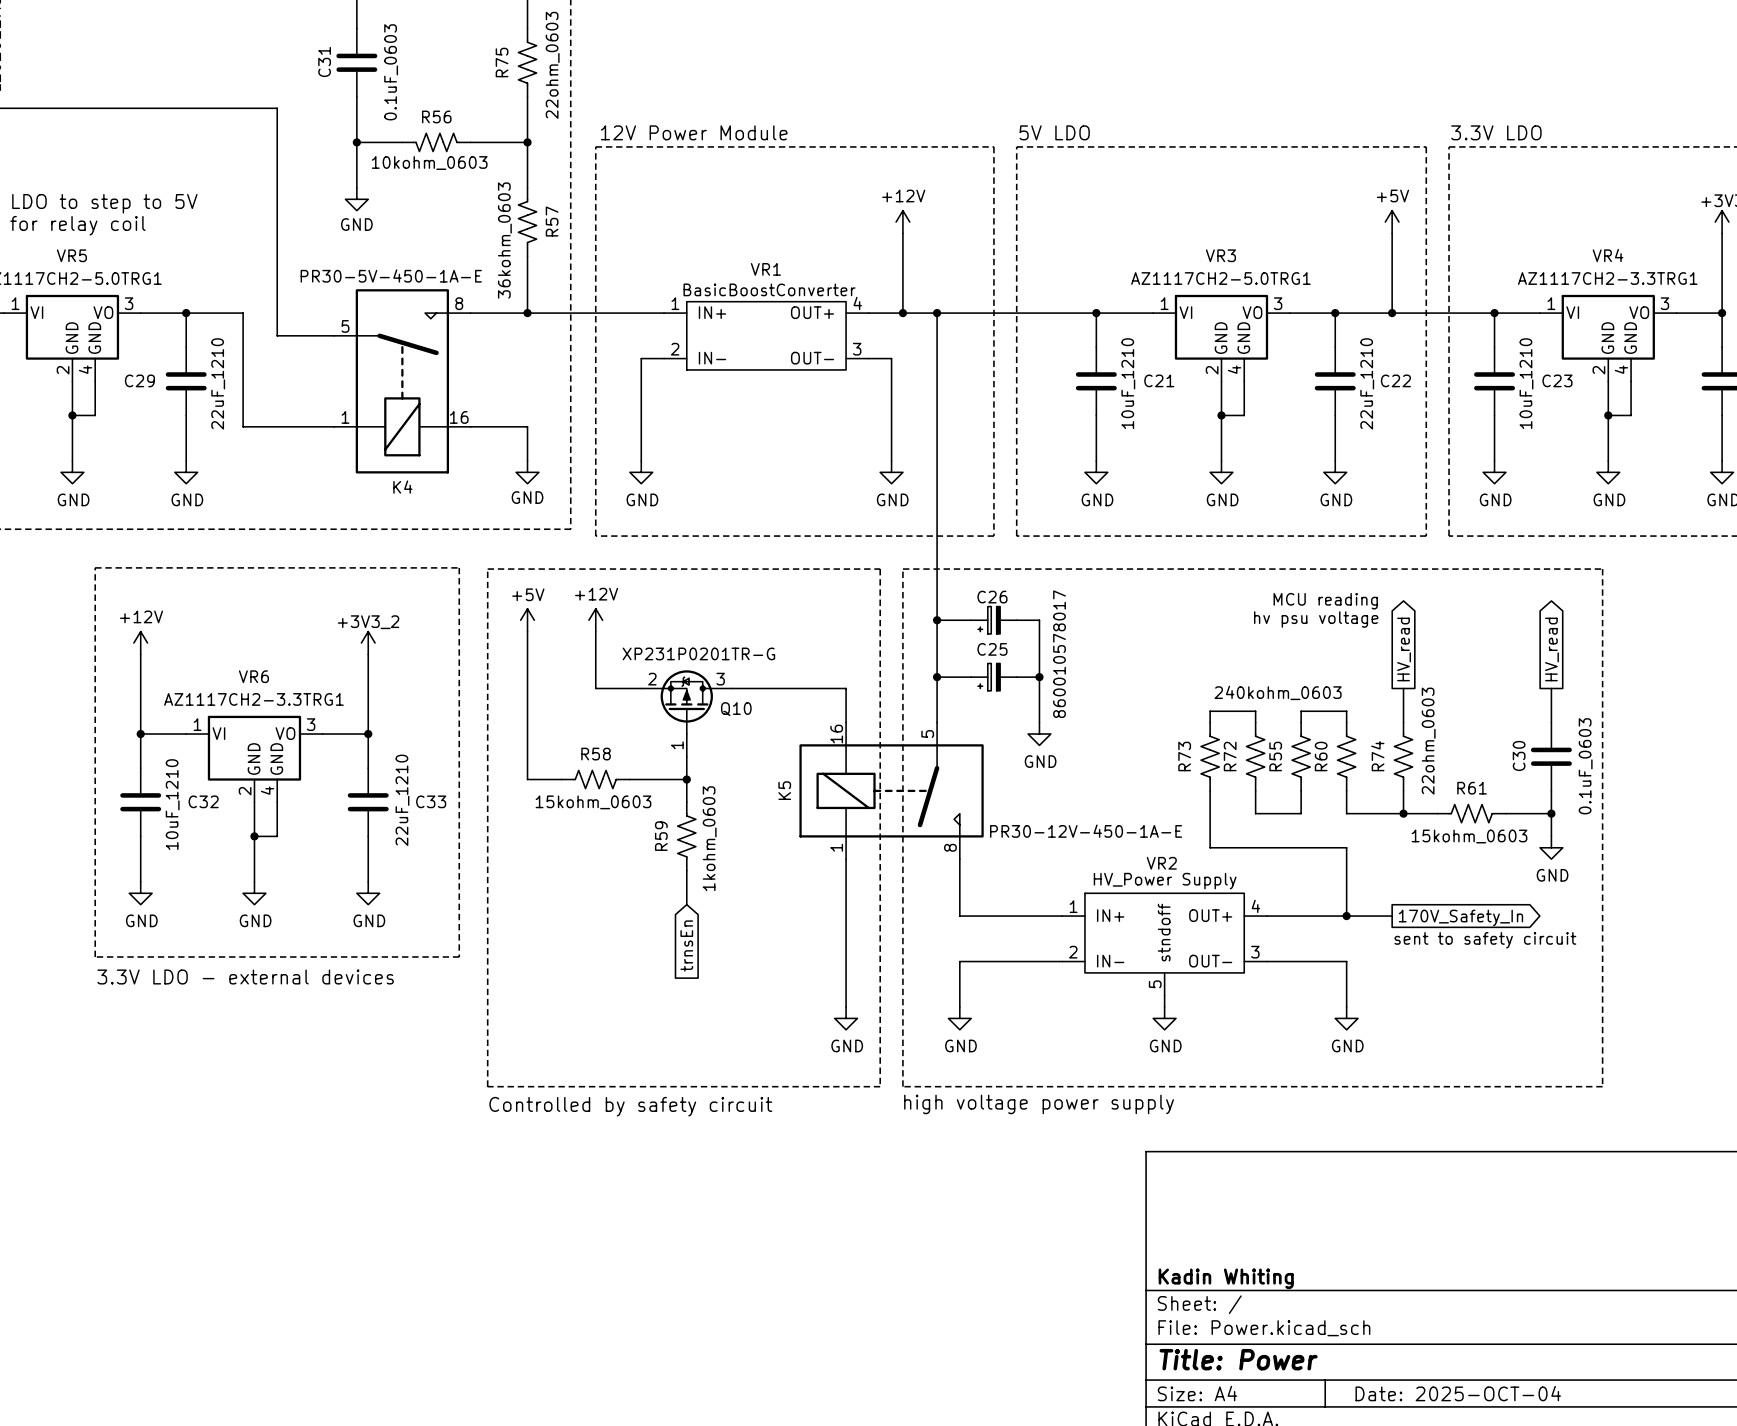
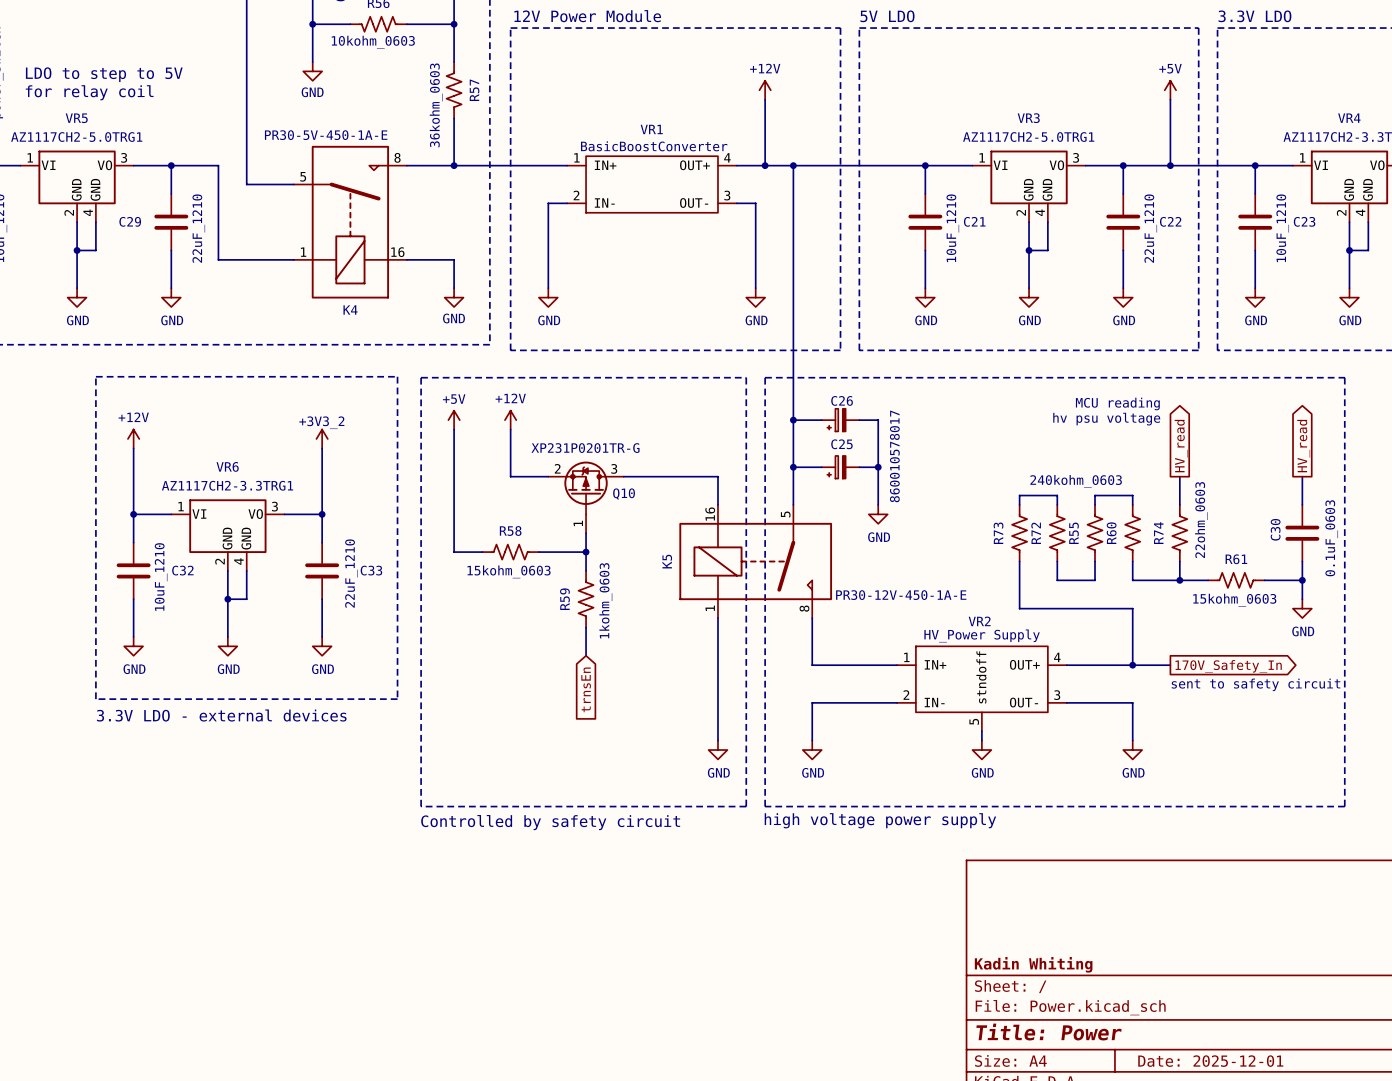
title block: Date: 2025-OCT-04 (1458, 1393) -> Date: 2025-12-01 (1210, 1061)

